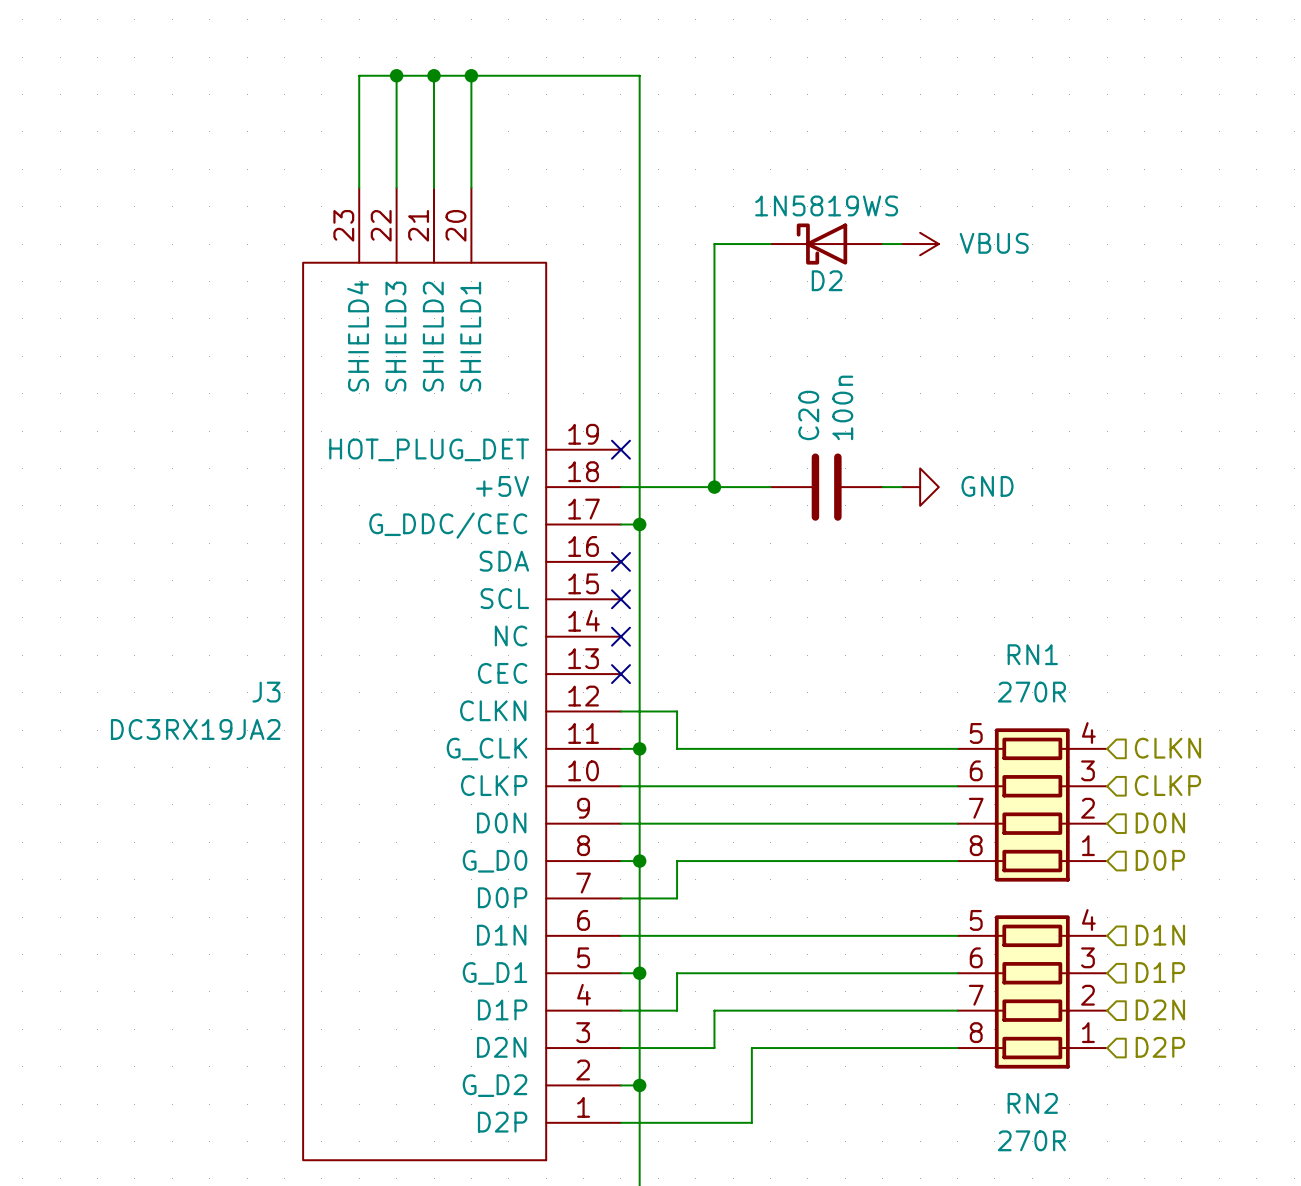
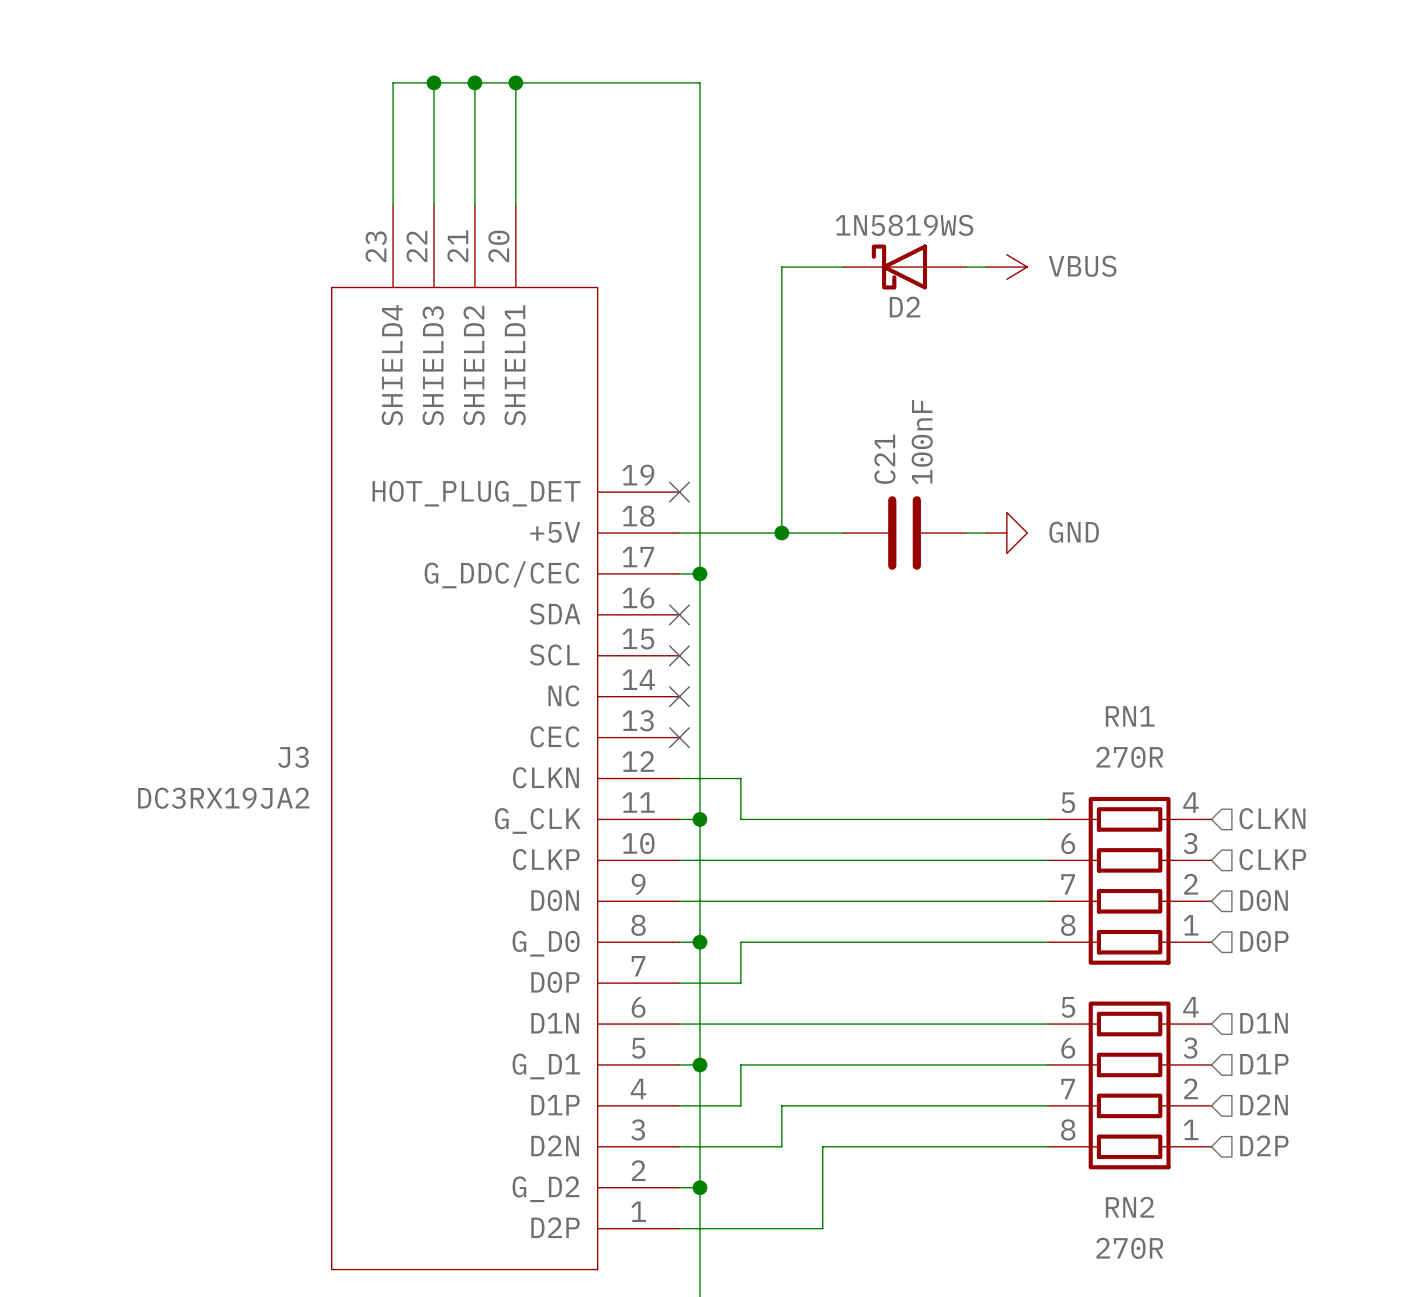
C20 value: 100n (842, 407) -> 100nF (922, 442)
C20 name: C20 (808, 415) -> C21 (884, 459)

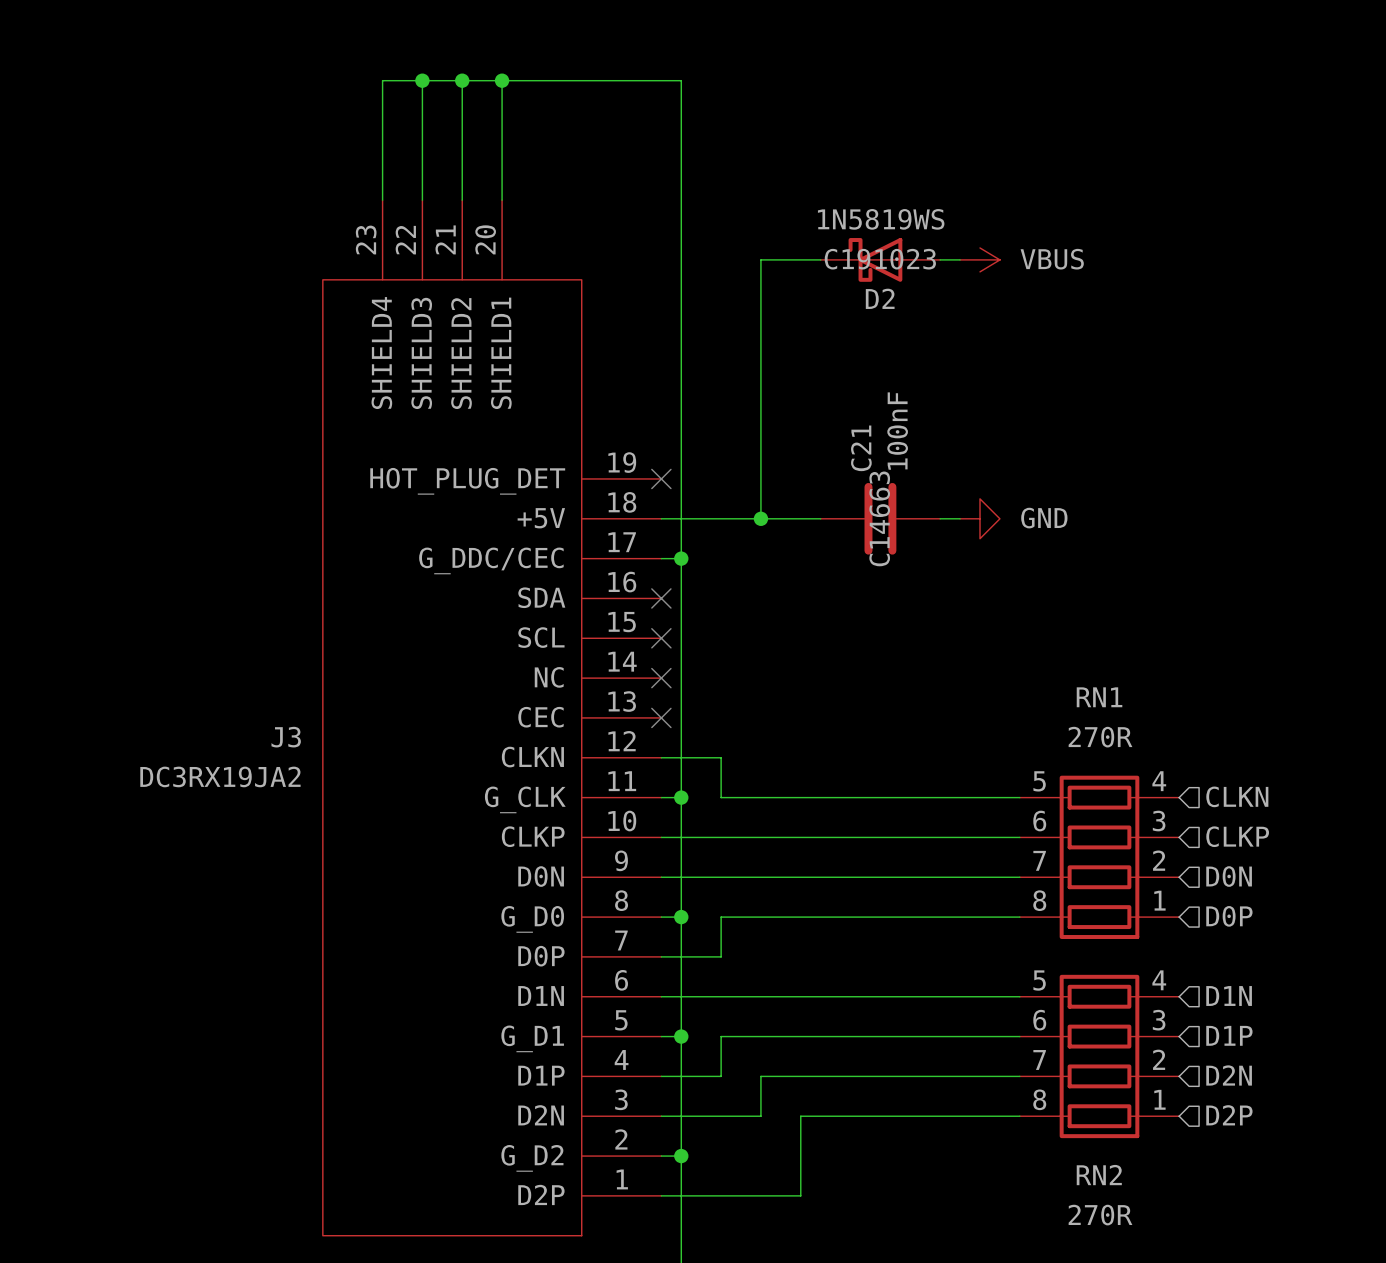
D2 text: none -> C191023 (880, 259)
C21 text: none -> C14663 (879, 518)

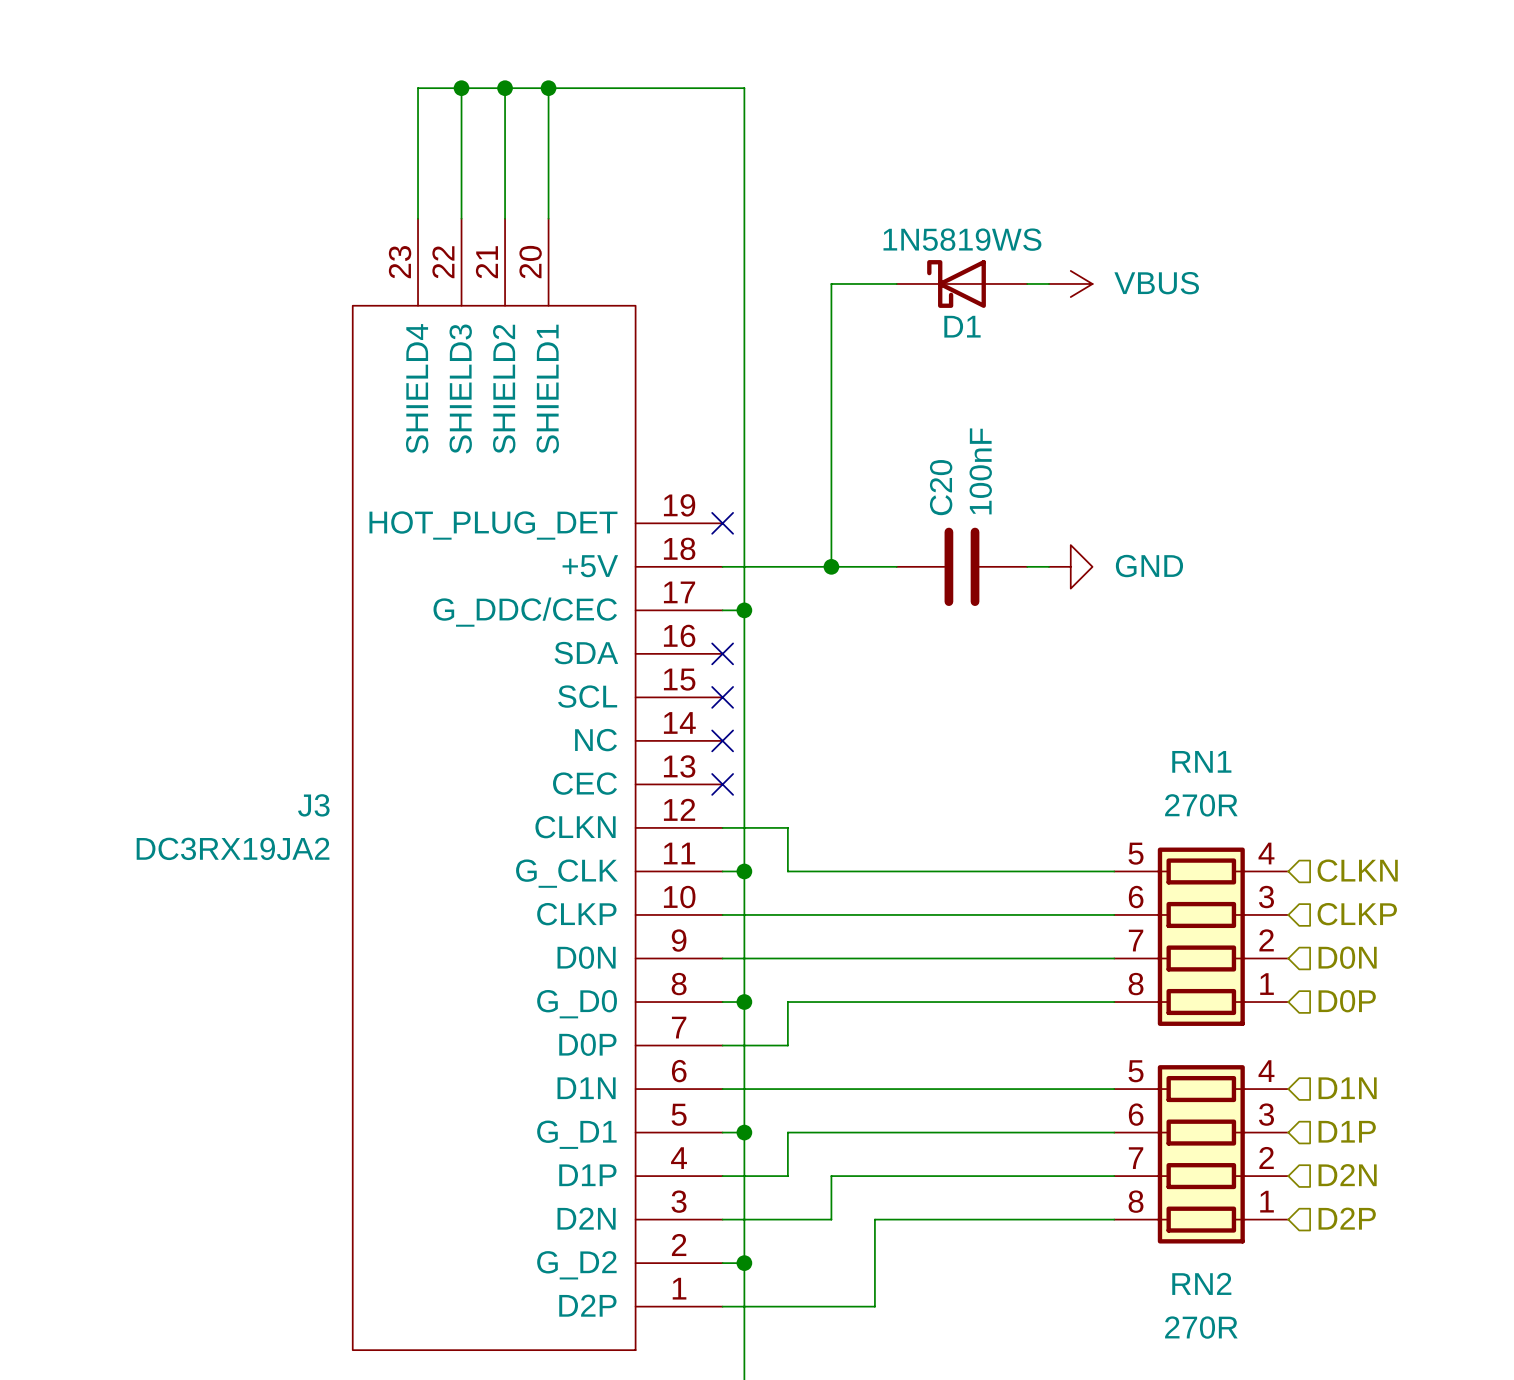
D2 text: C191023 (880, 259) -> none
D2 name: D2 (880, 298) -> D1 (962, 326)
C21 name: C21 (861, 448) -> C20 (941, 487)
C21 text: C14663 (879, 518) -> none

